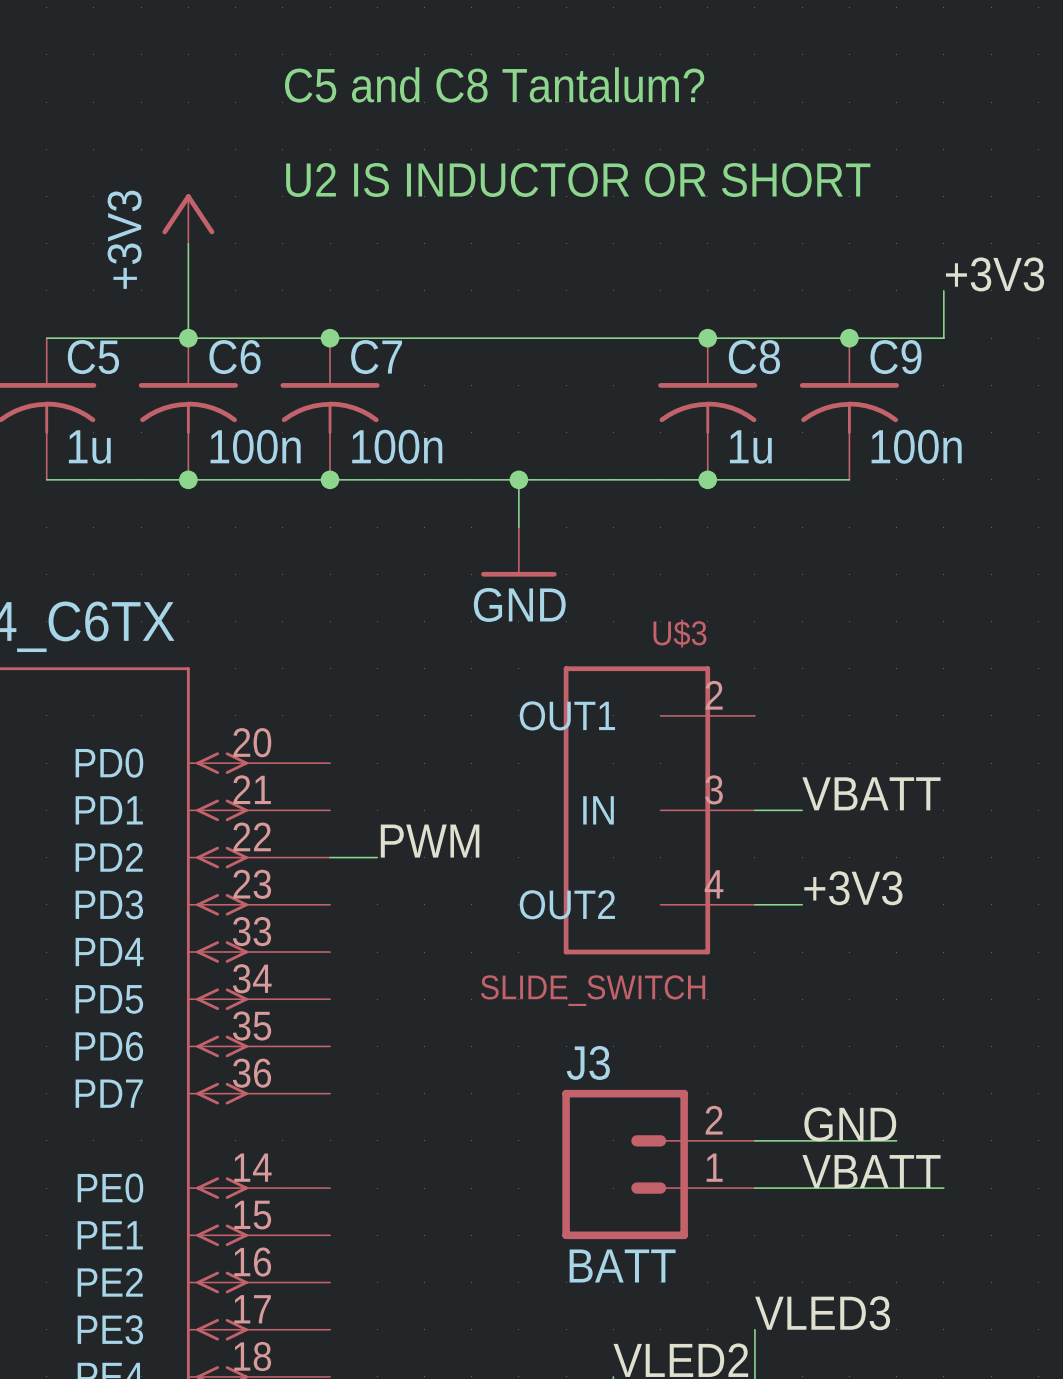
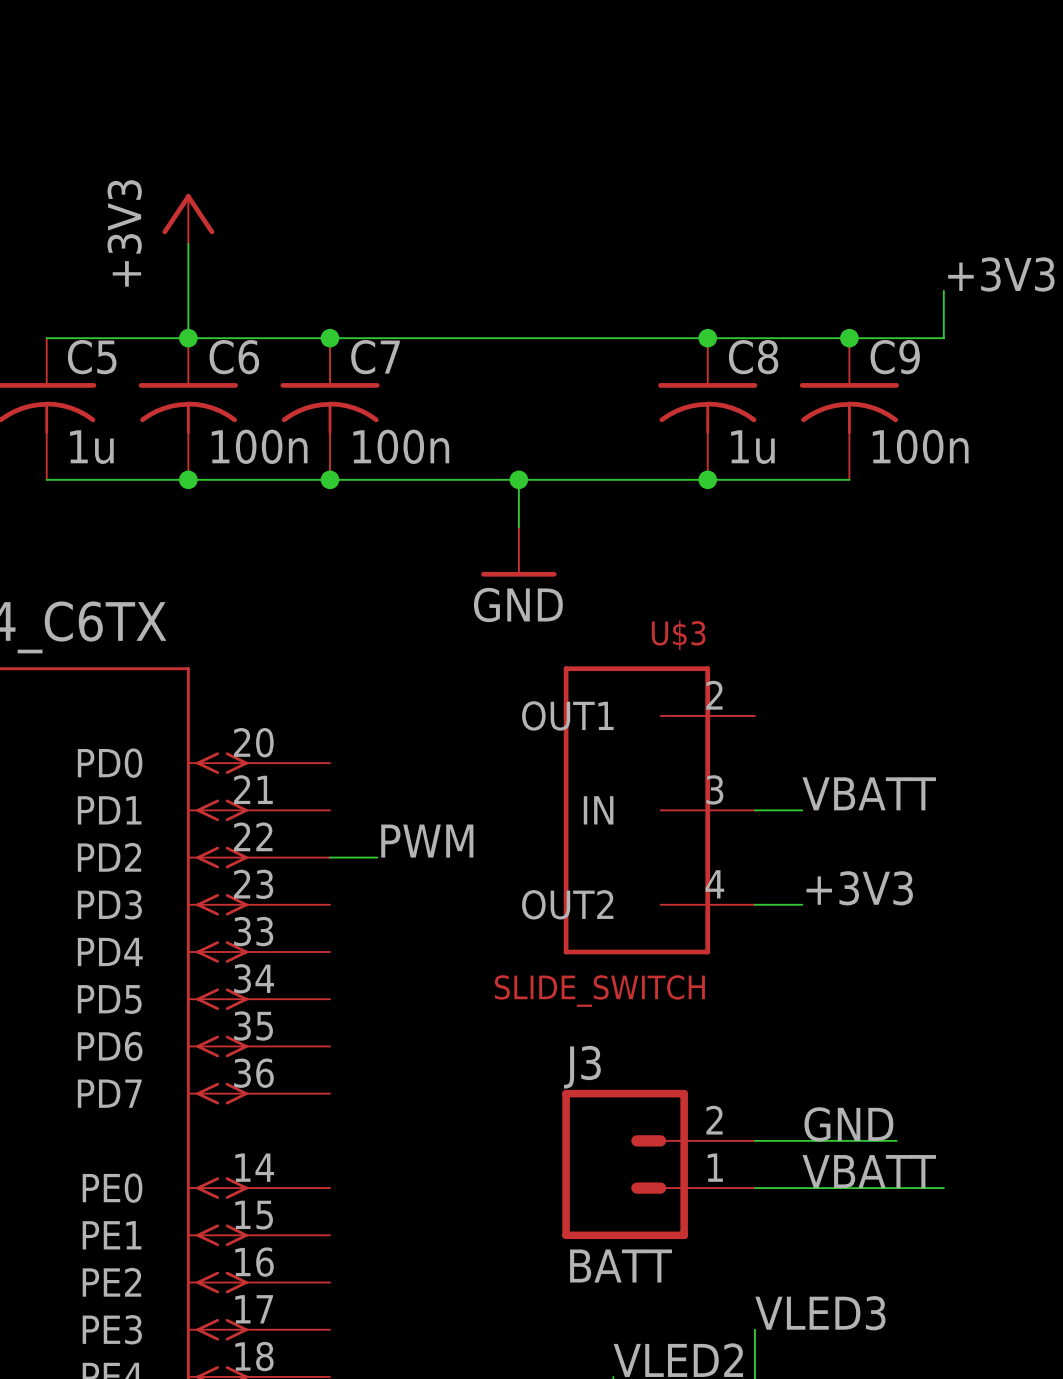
text: C5 and C8 Tantalum? (494, 84) -> none
text: U2 IS INDUCTOR OR SHORT (578, 180) -> none

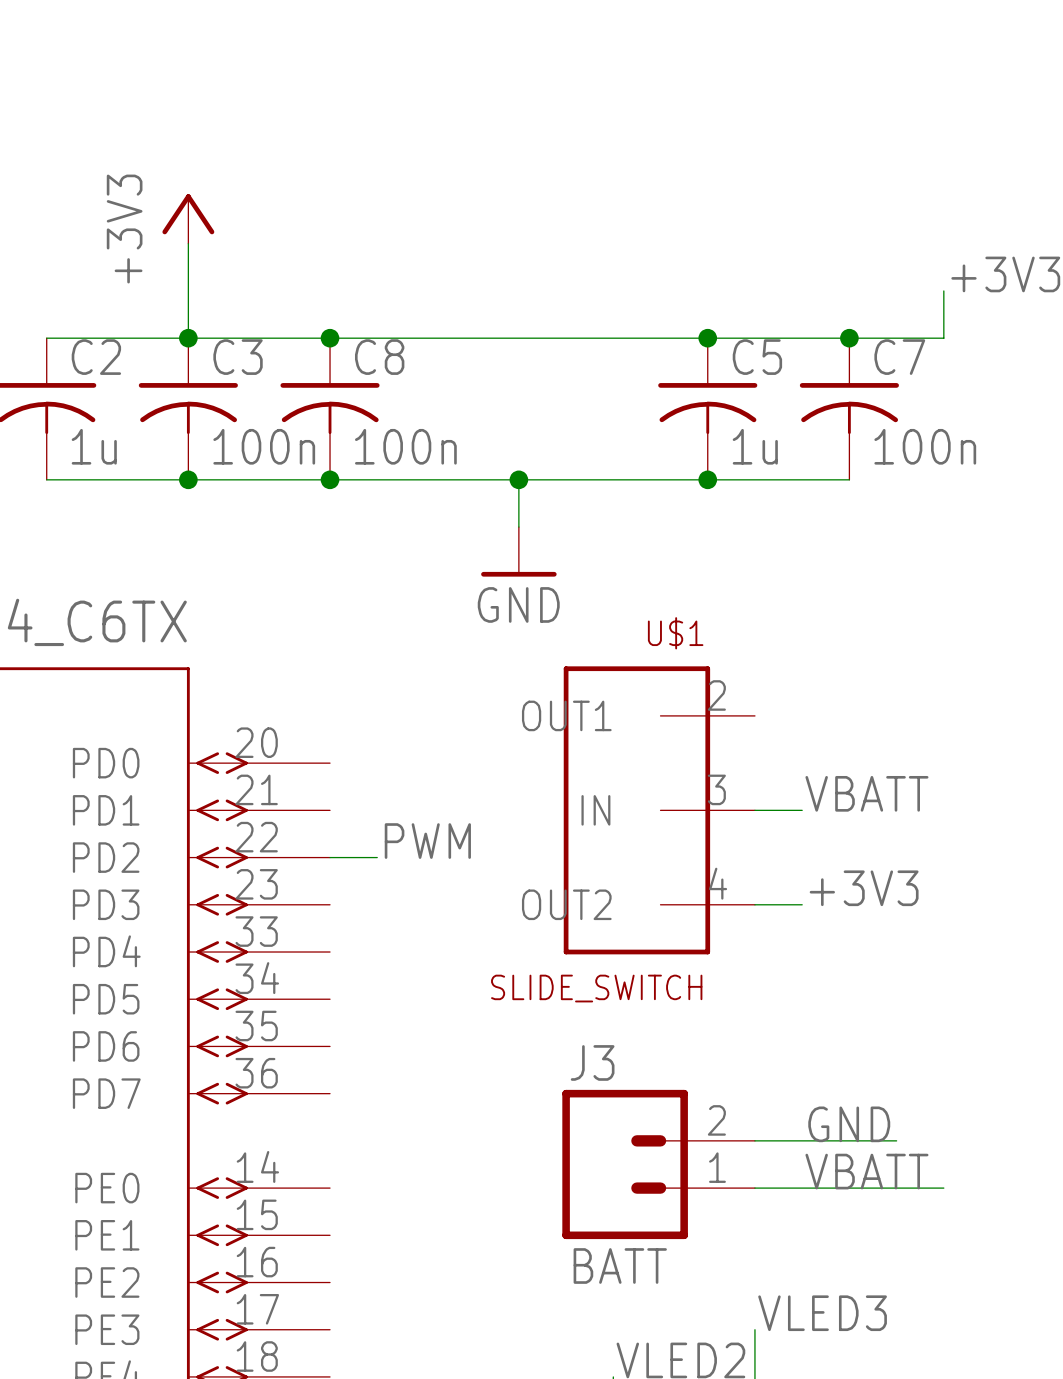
C5 name: C5 (92, 357) -> C2 (96, 357)
C6 name: C6 (234, 357) -> C3 (238, 357)
C7 name: C7 (375, 357) -> C8 (379, 357)
C8 name: C8 (753, 357) -> C5 (757, 357)
C9 name: C9 (895, 357) -> C7 (899, 357)
U$3 name: U$3 (678, 635) -> U$1 (675, 633)

